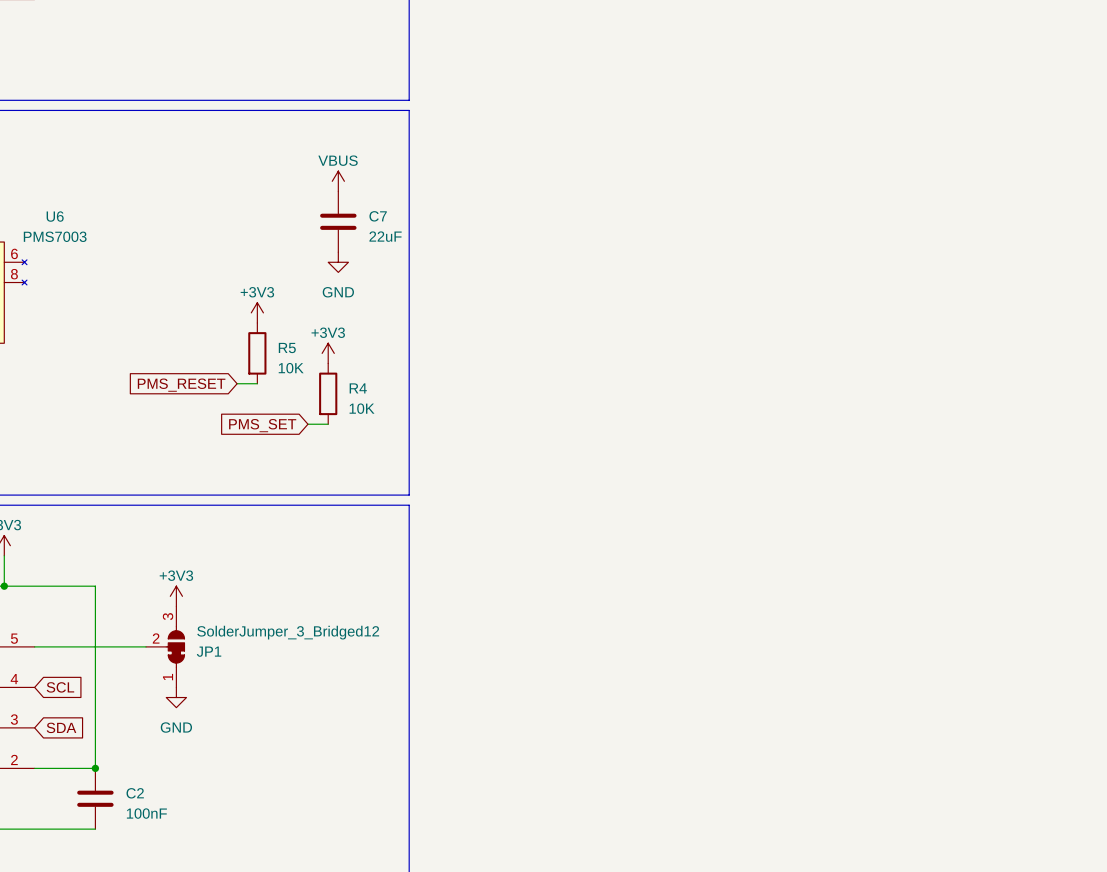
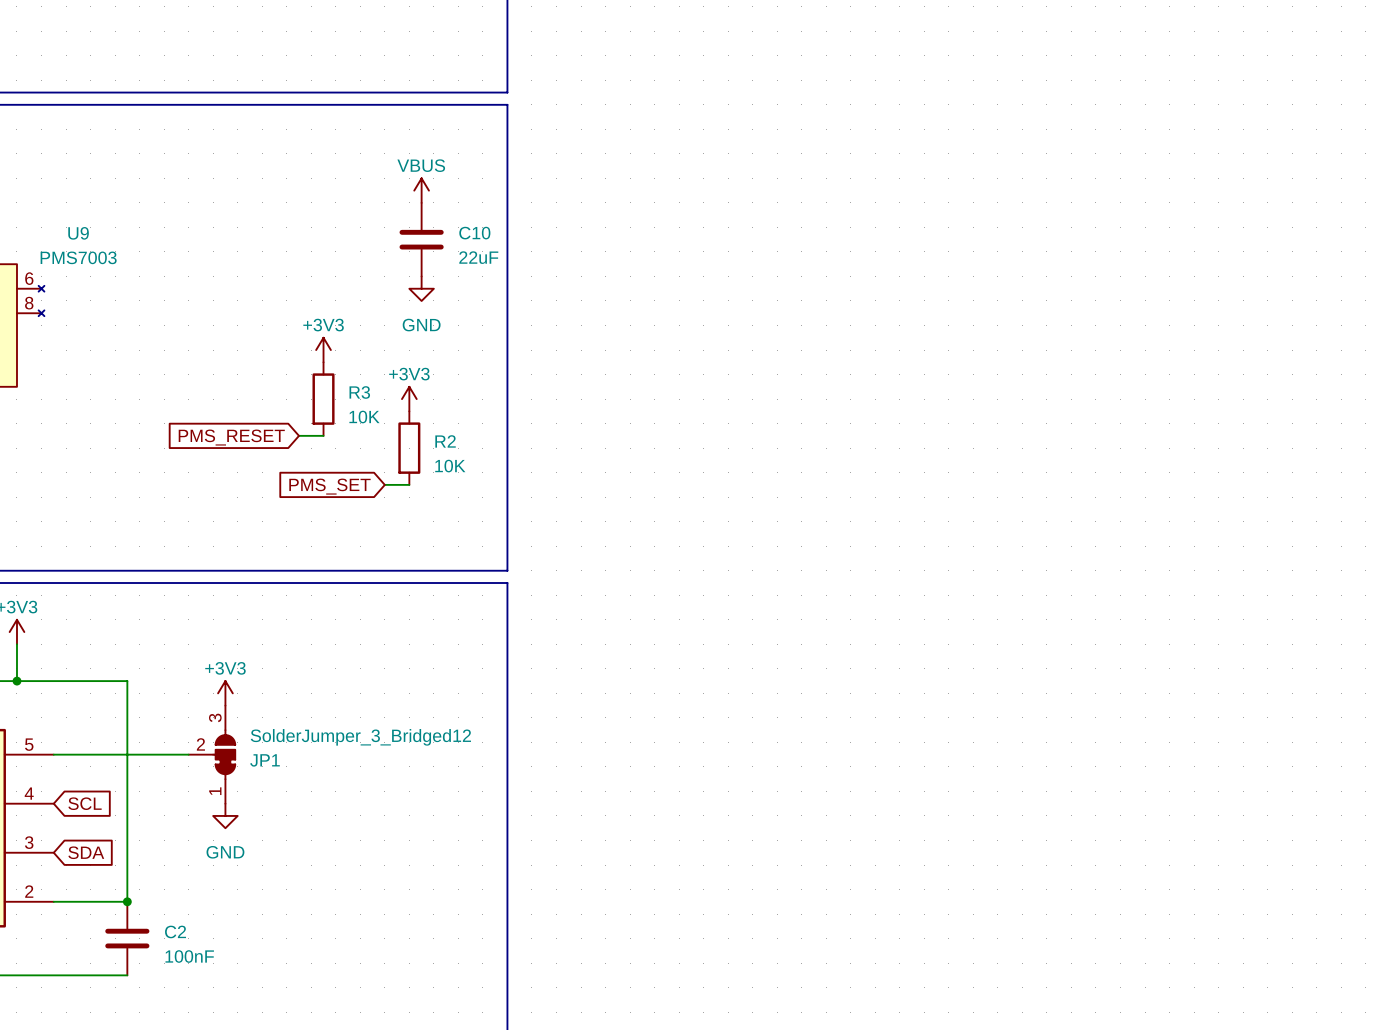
U6 name: U6 (55, 216) -> U9 (78, 233)
C7 name: C7 (378, 216) -> C10 (474, 233)
R5 name: R5 (287, 348) -> R3 (359, 392)
R4 name: R4 (358, 388) -> R2 (445, 441)

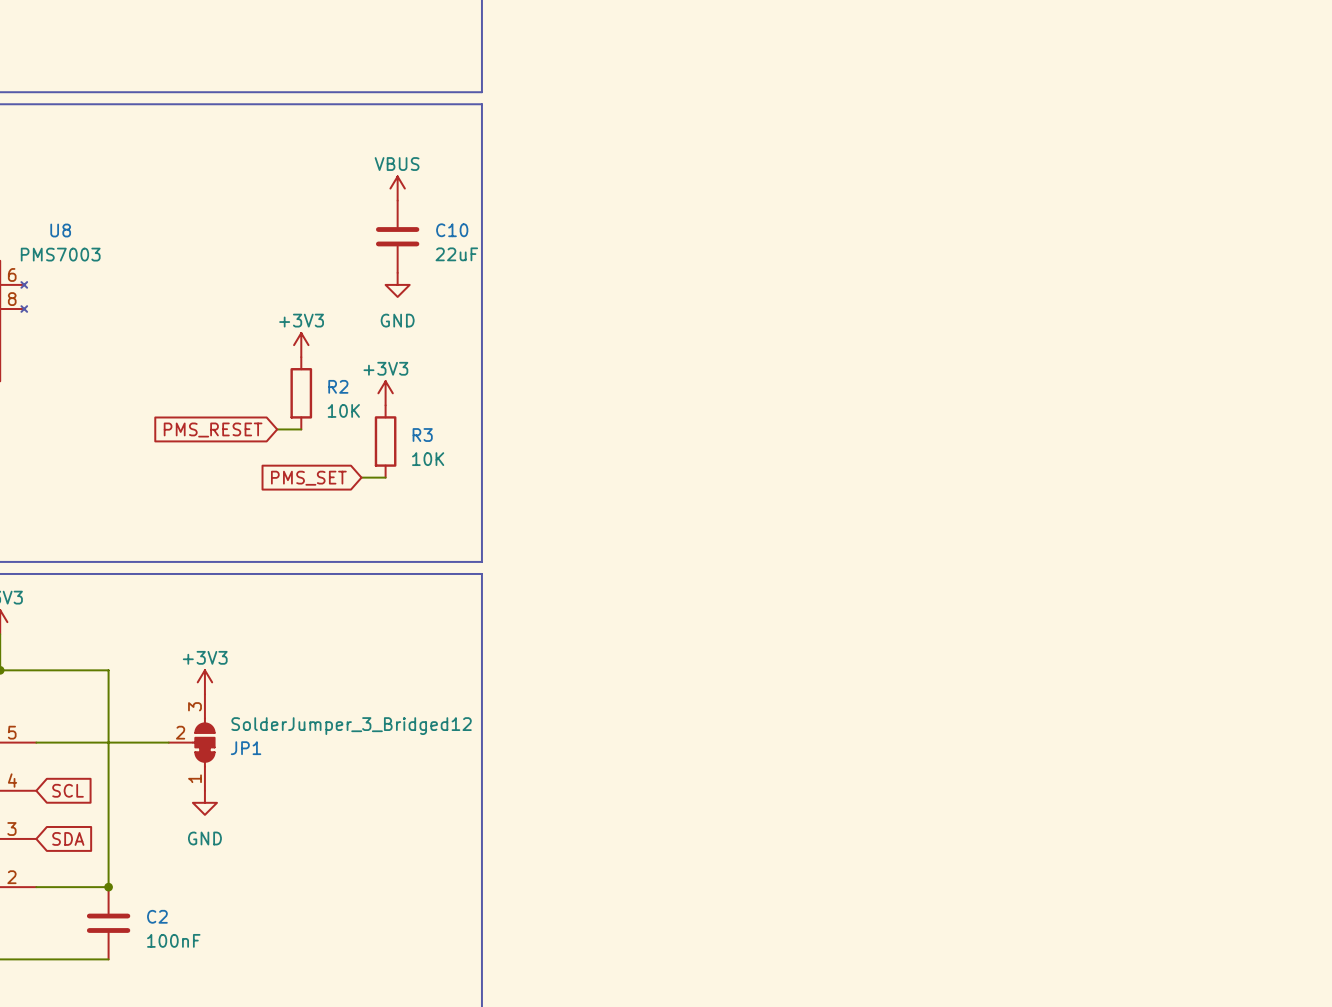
U9 name: U9 (78, 233) -> U8 (60, 230)
R3 name: R3 (359, 392) -> R2 (338, 386)
R2 name: R2 (445, 441) -> R3 (422, 435)

